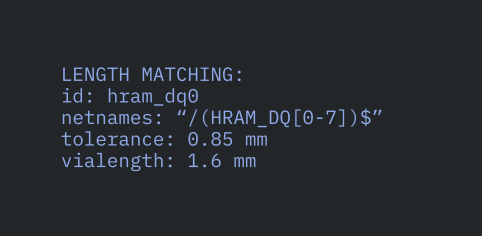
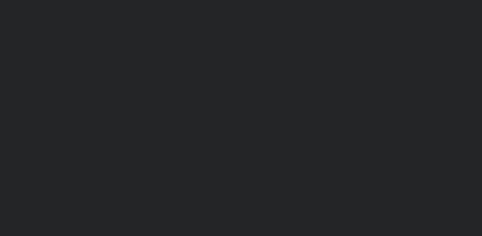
text: LENGTH MATCHING: (151, 74) -> none
text: id: hram_dq0 (130, 97) -> none
text: netnames: “/(HRAM_DQ[0-7])$” (222, 117) -> none
text: tolerance: 0.85 mm (164, 138) -> none
text: vialength: 1.6 mm (158, 161) -> none

